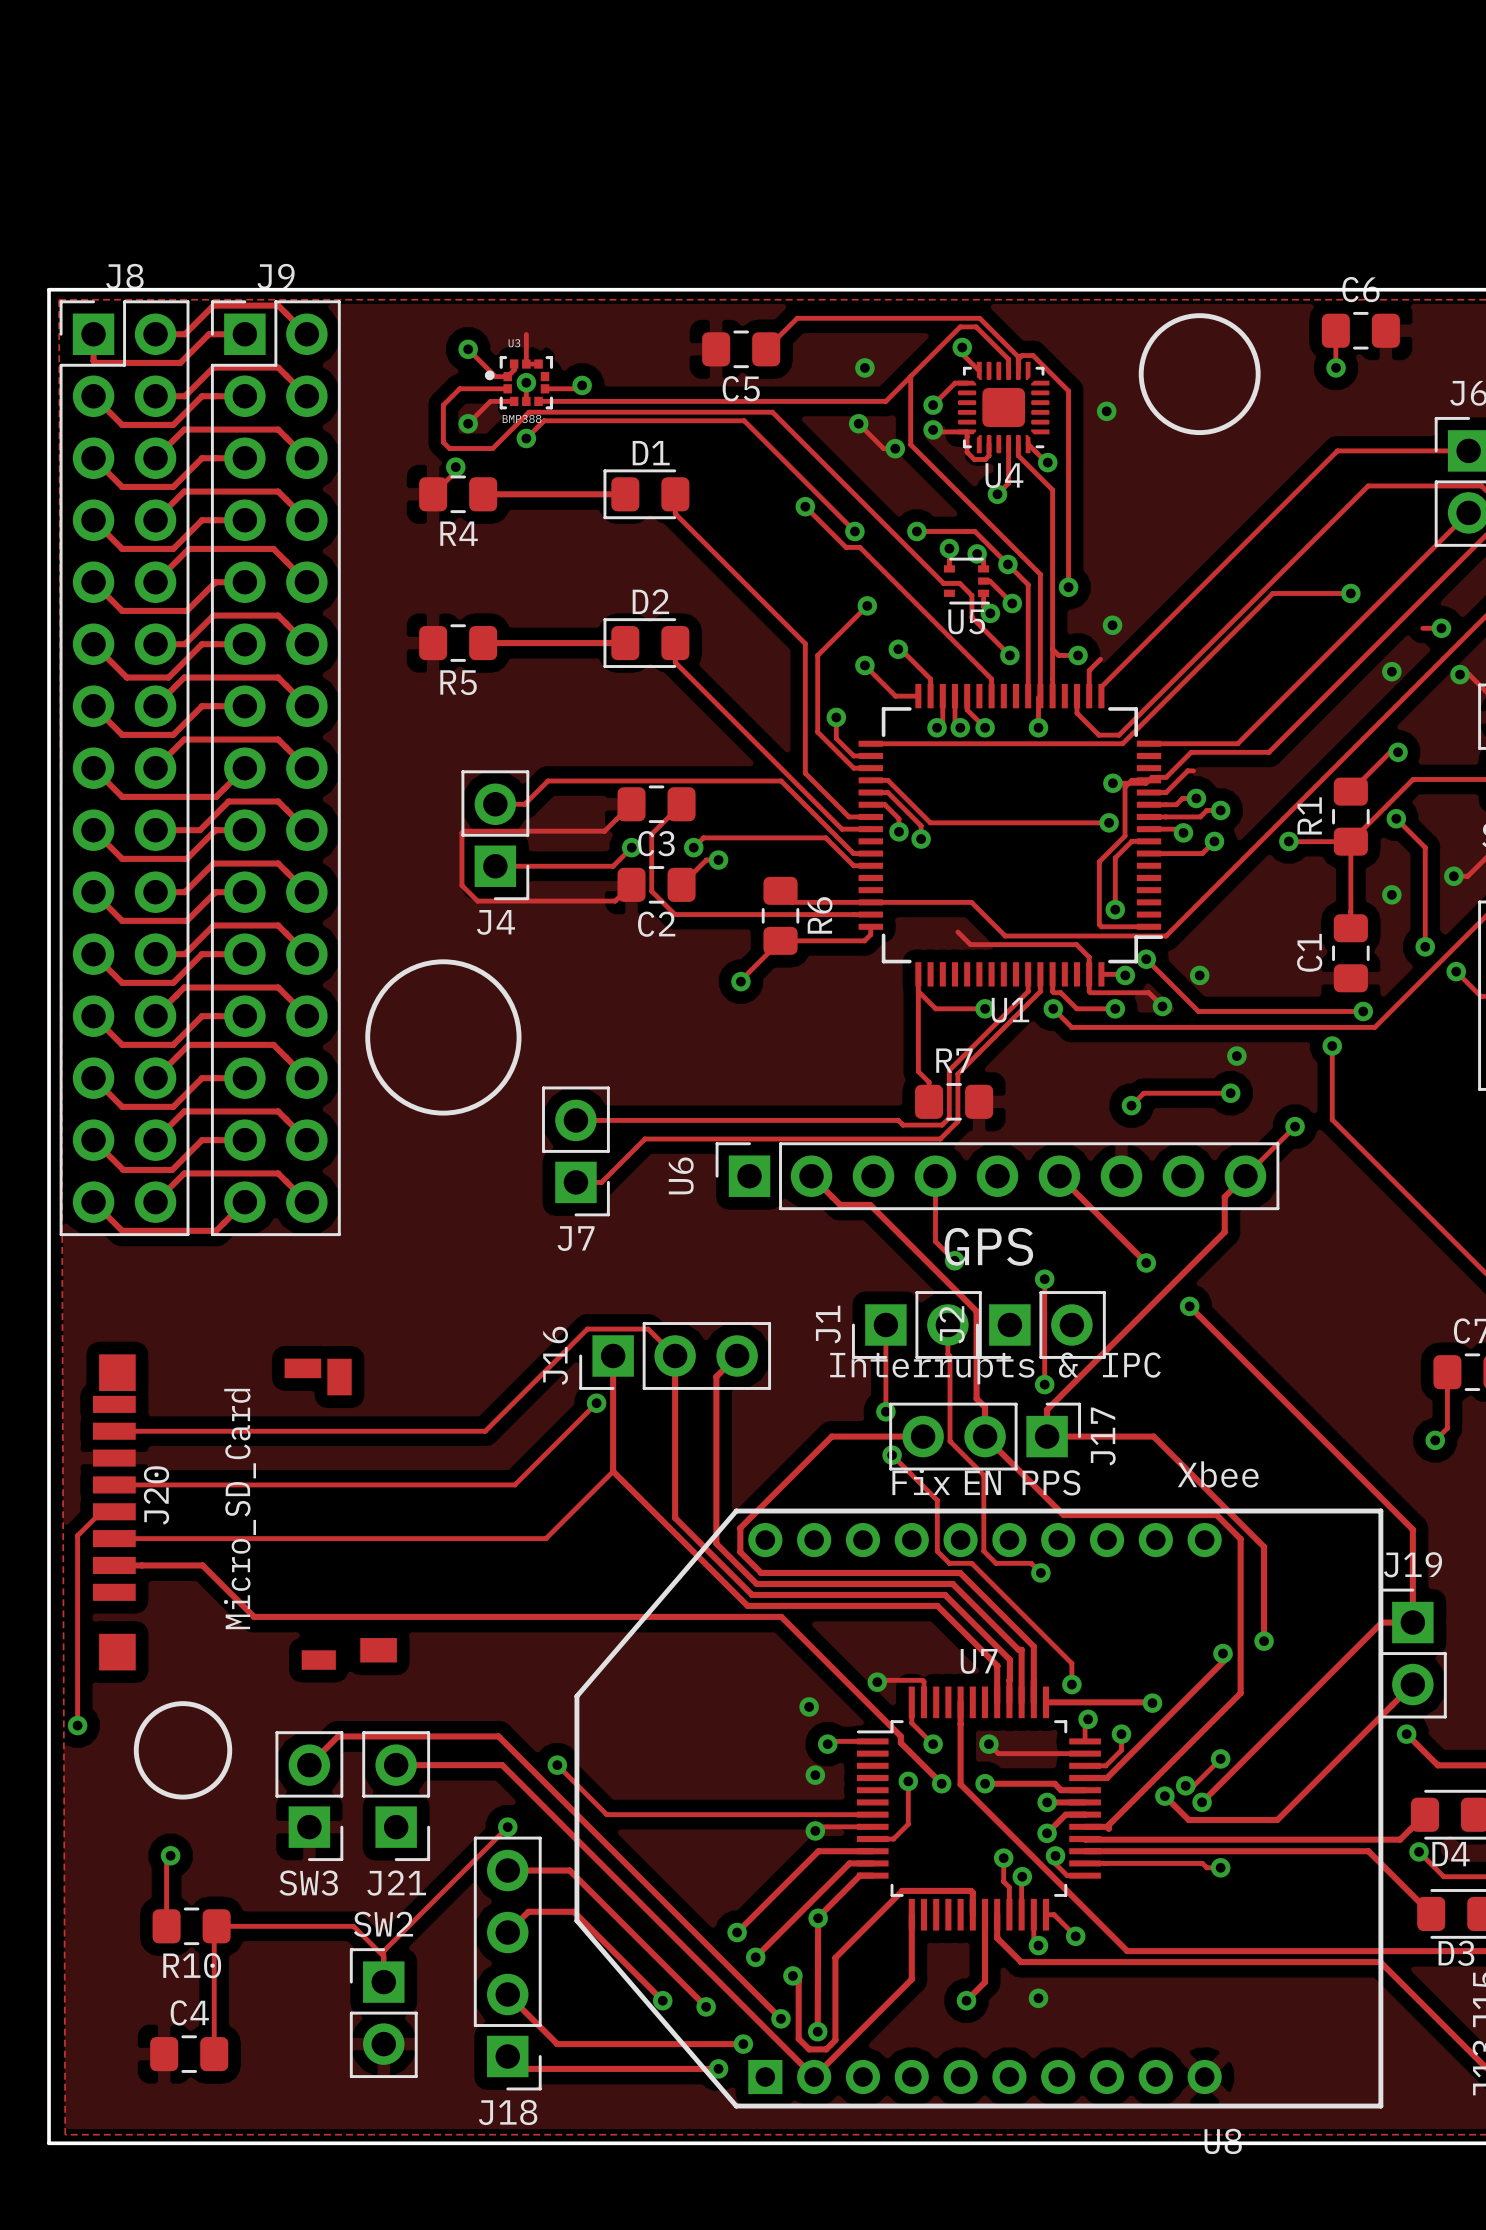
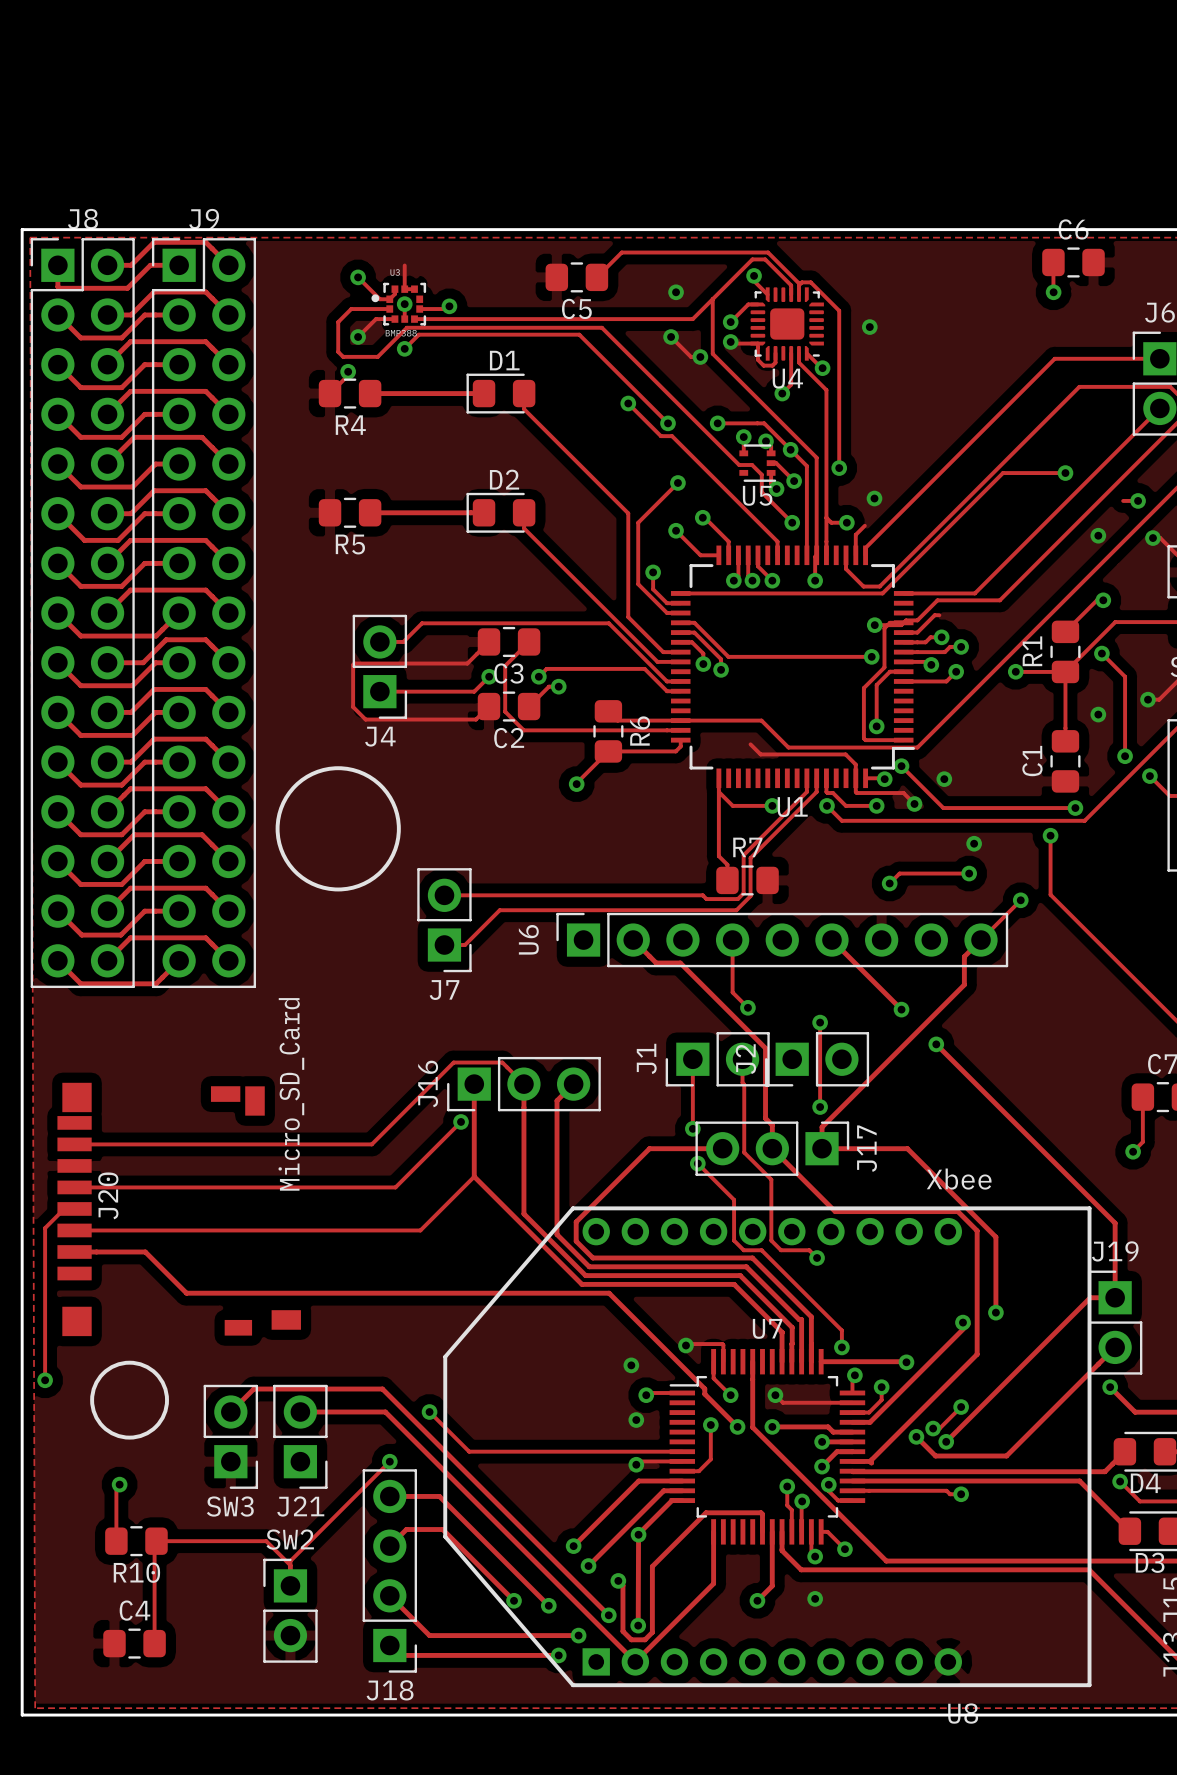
drawing: [1138, 313, 1261, 436] -> none
text: GPS (988, 1246) -> none
text: Interrupts & IPC (995, 1368) -> none
text: Fix (921, 1482) -> none
text: EN (982, 1482) -> none
text: PPS (1051, 1482) -> none
J20 value position: Micro_SD_Card (239, 1509) -> Micro_SD_Card (291, 1094)

